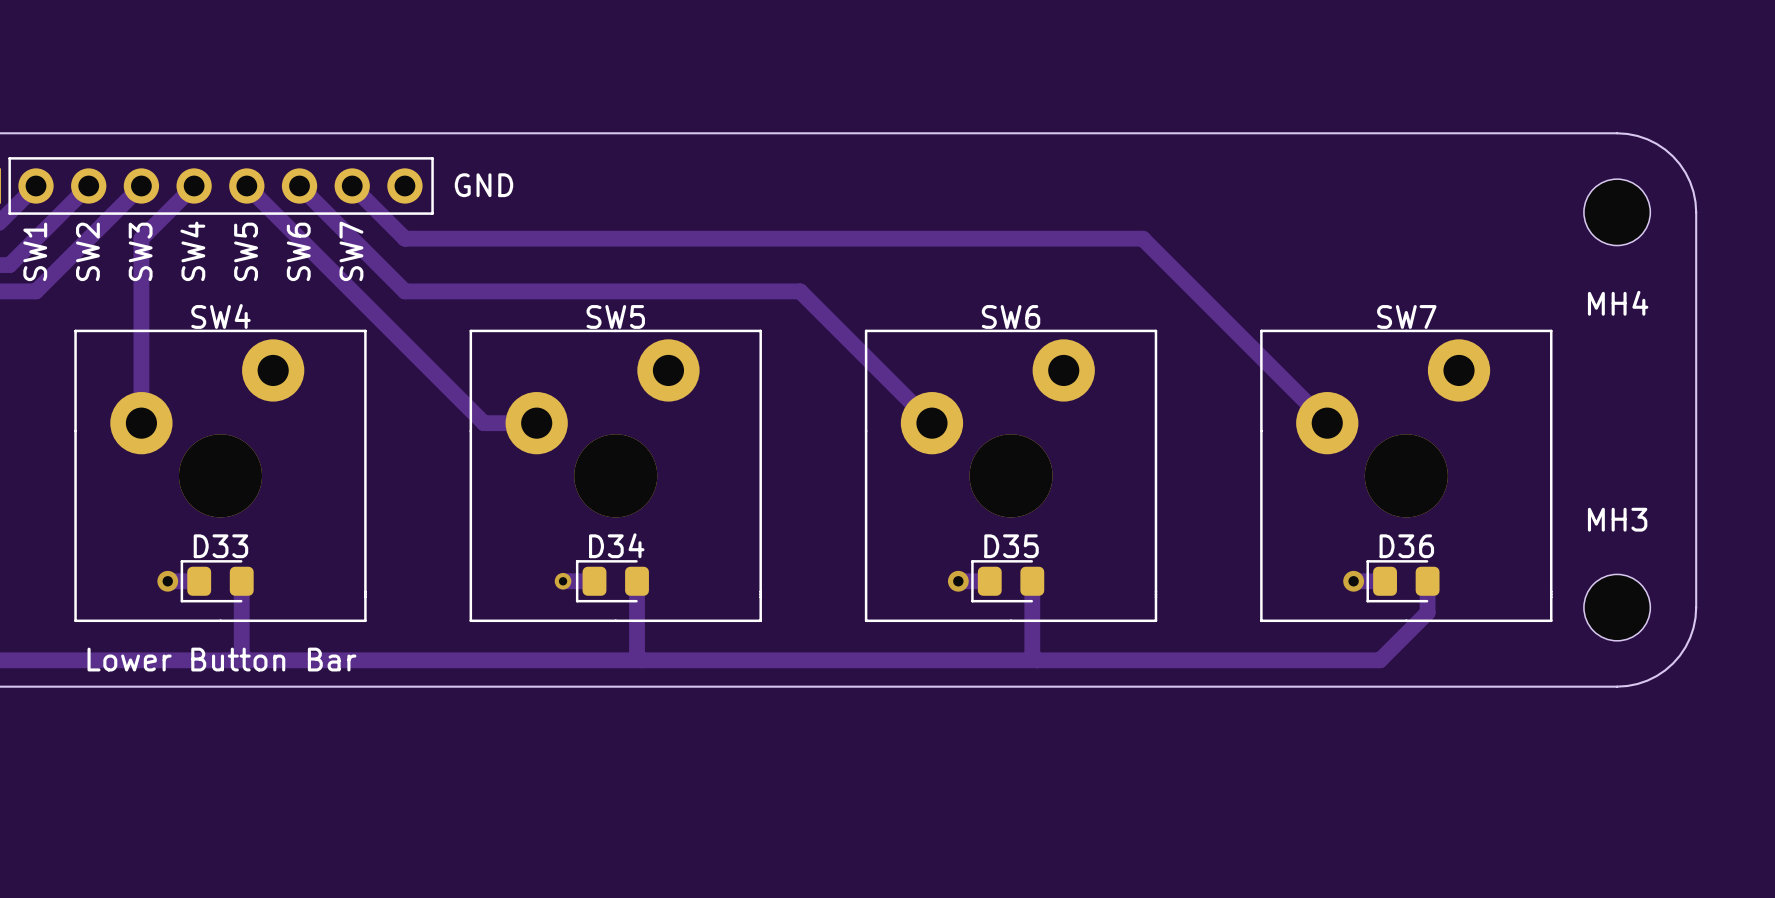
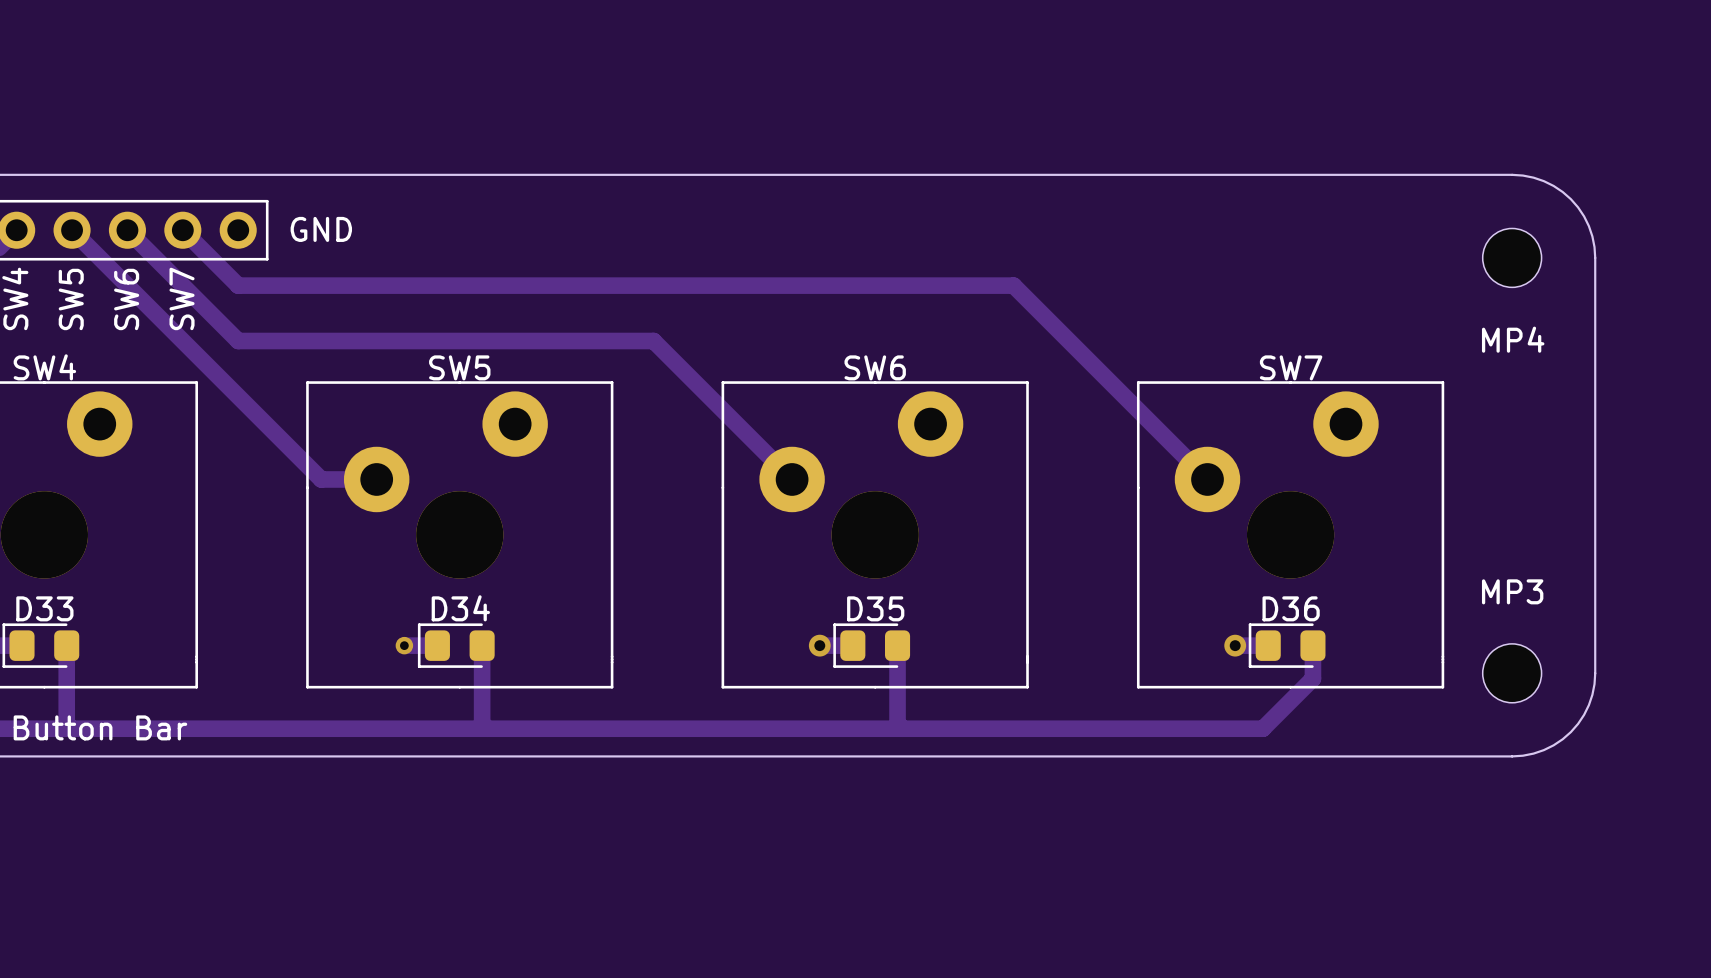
MH4: (1617, 212) -> none
MP4: none -> (1512, 257)
MH3: (1617, 607) -> none
MP3: none -> (1512, 673)

